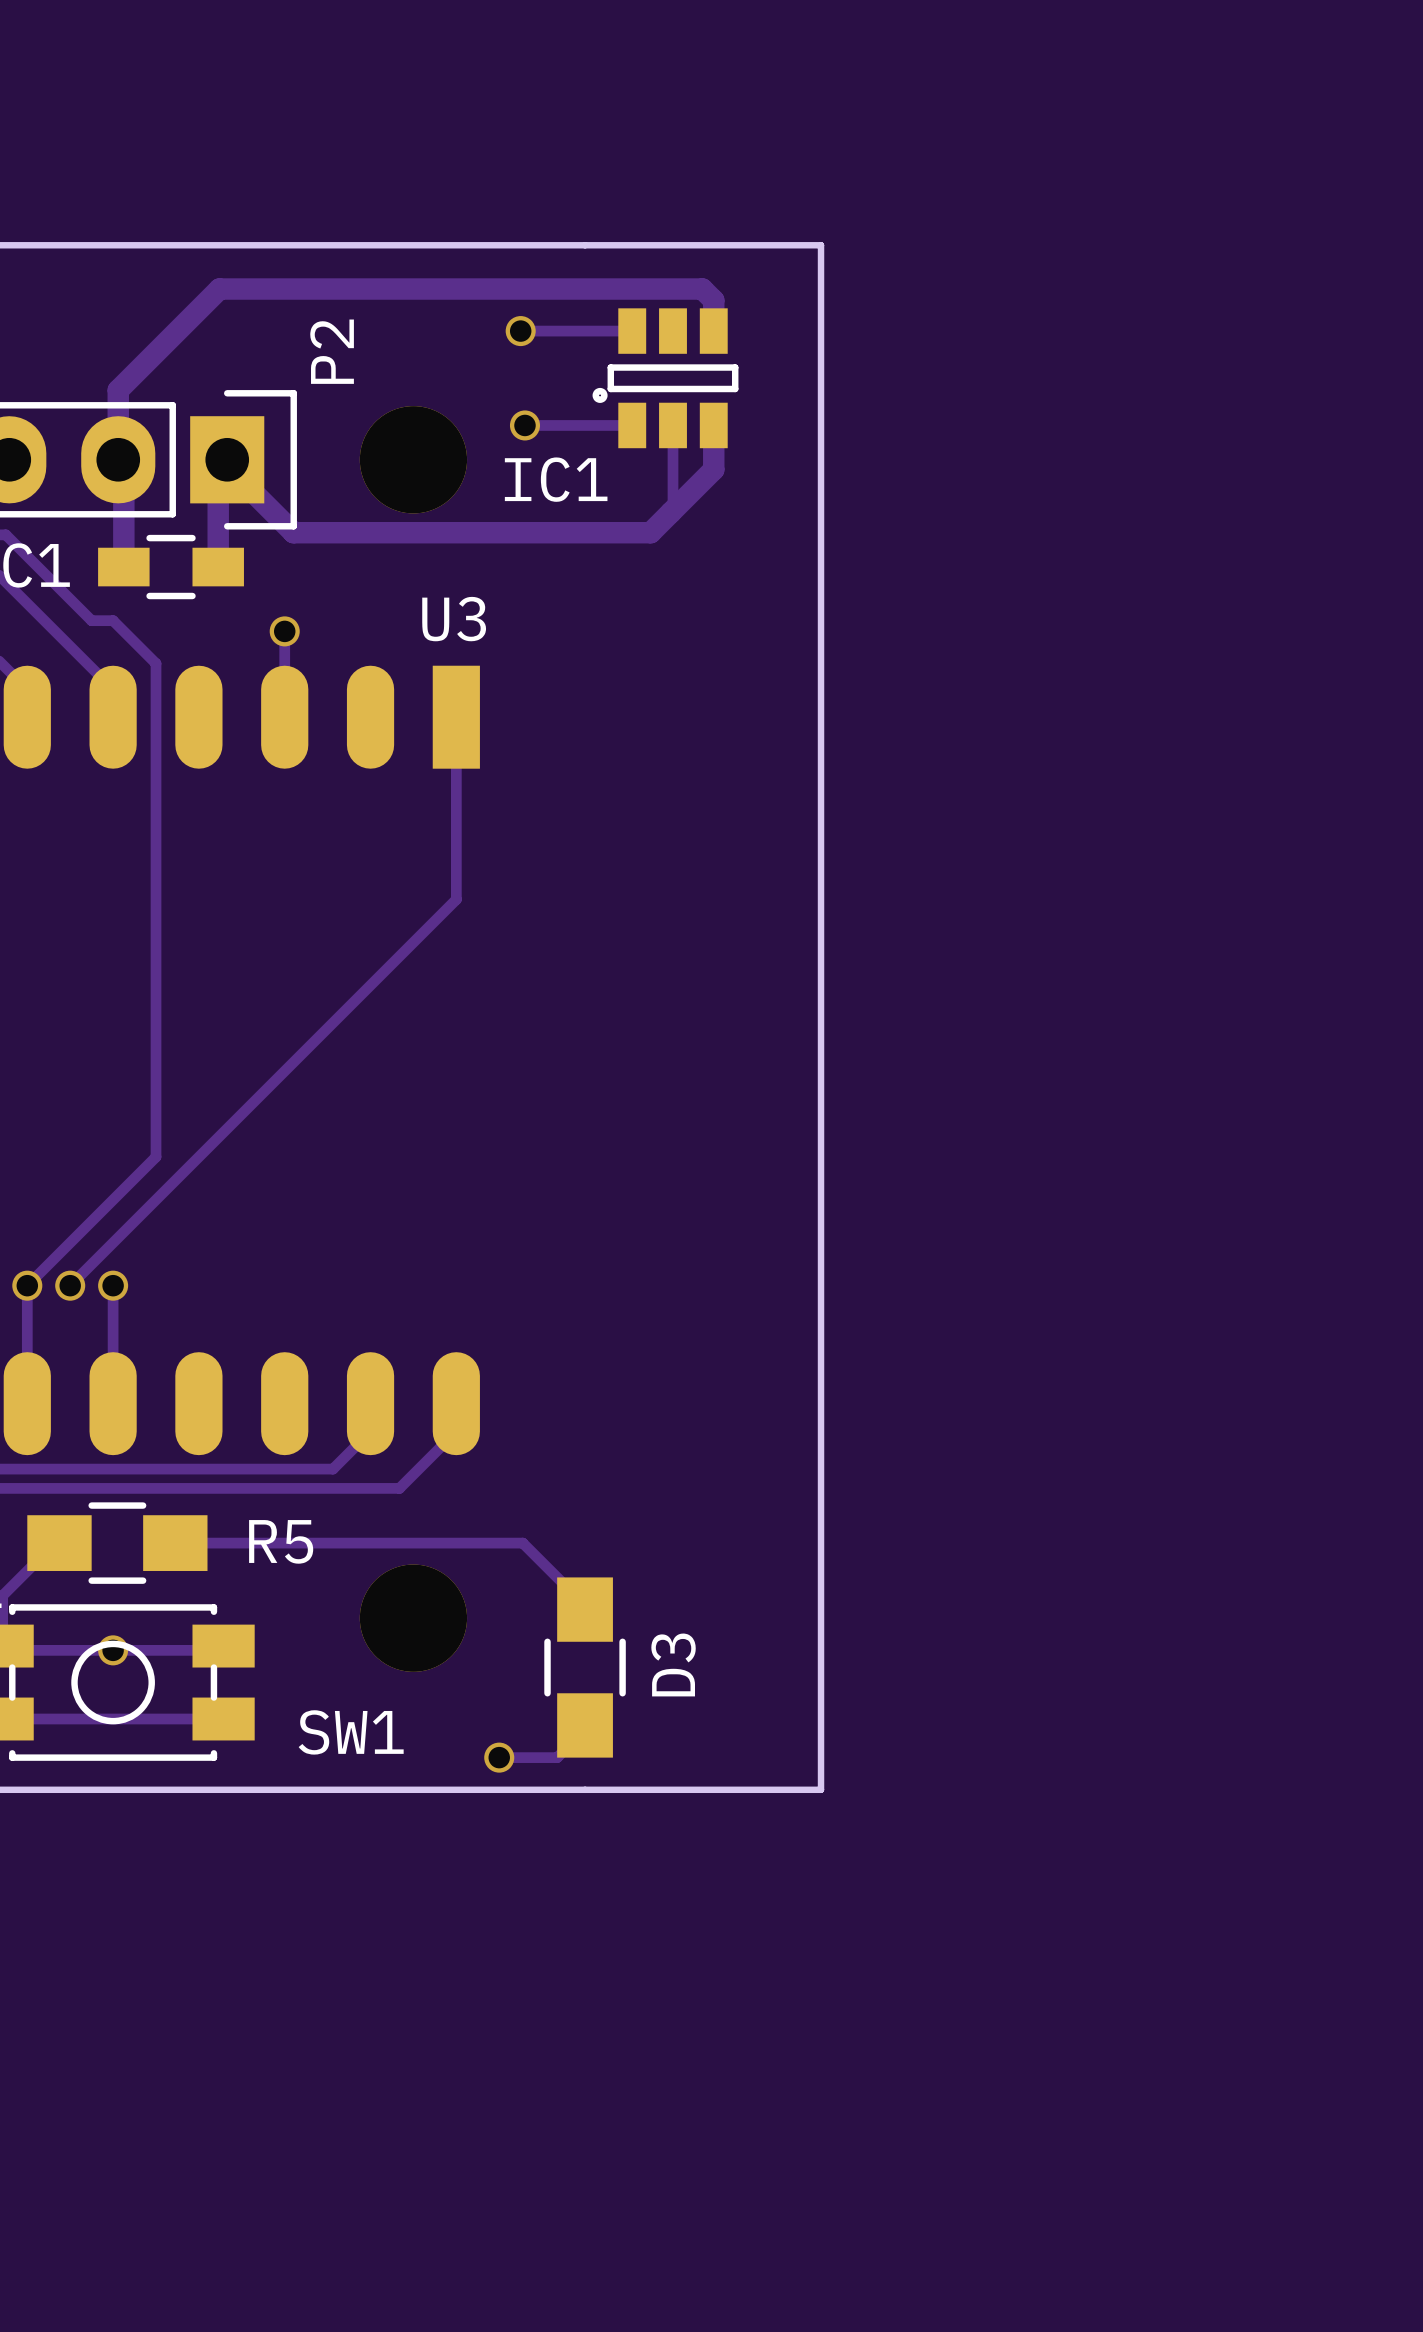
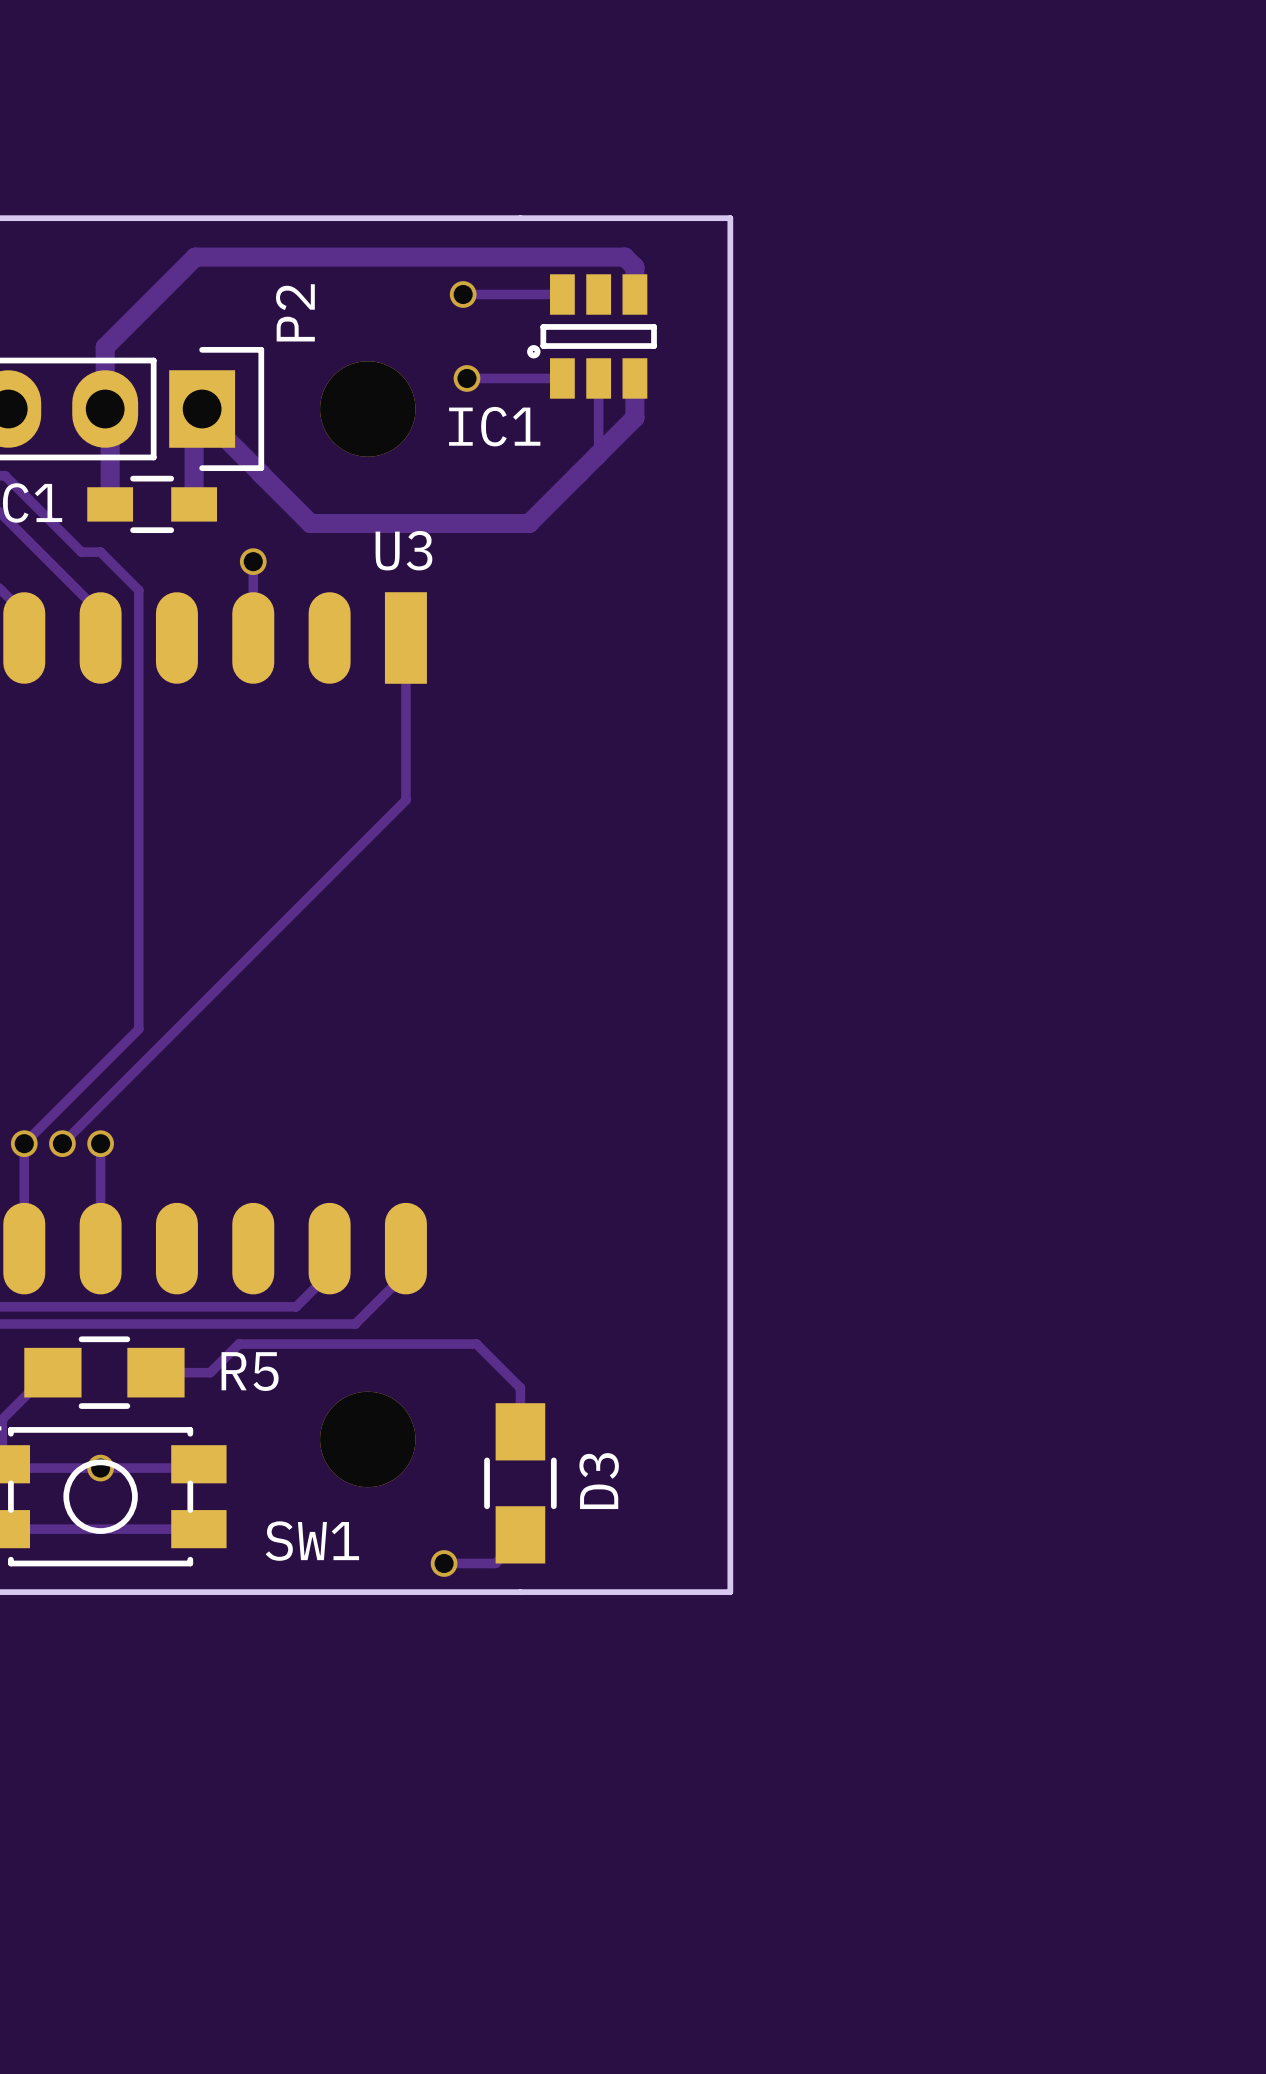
track: (293, 532) (650, 532) -> (261, 473) (310, 523) (529, 523) (578, 473)
track: (236, 1543) (522, 1543) (585, 1605) -> (210, 1372) (238, 1344) (476, 1344) (520, 1387) (520, 1428)

